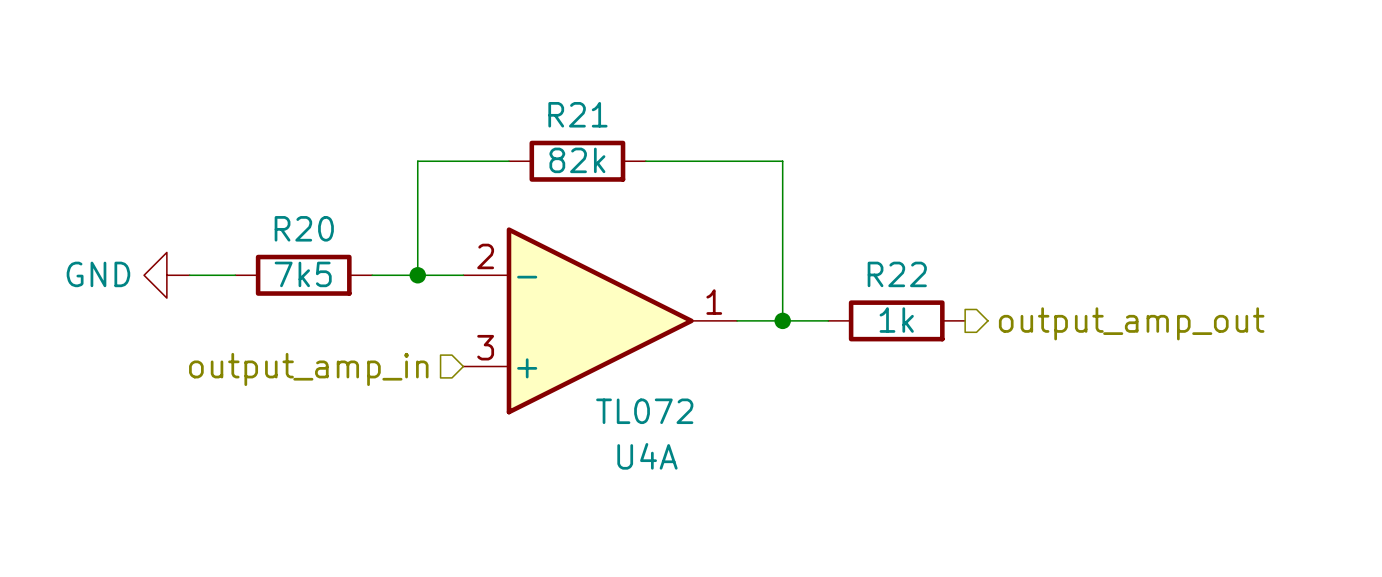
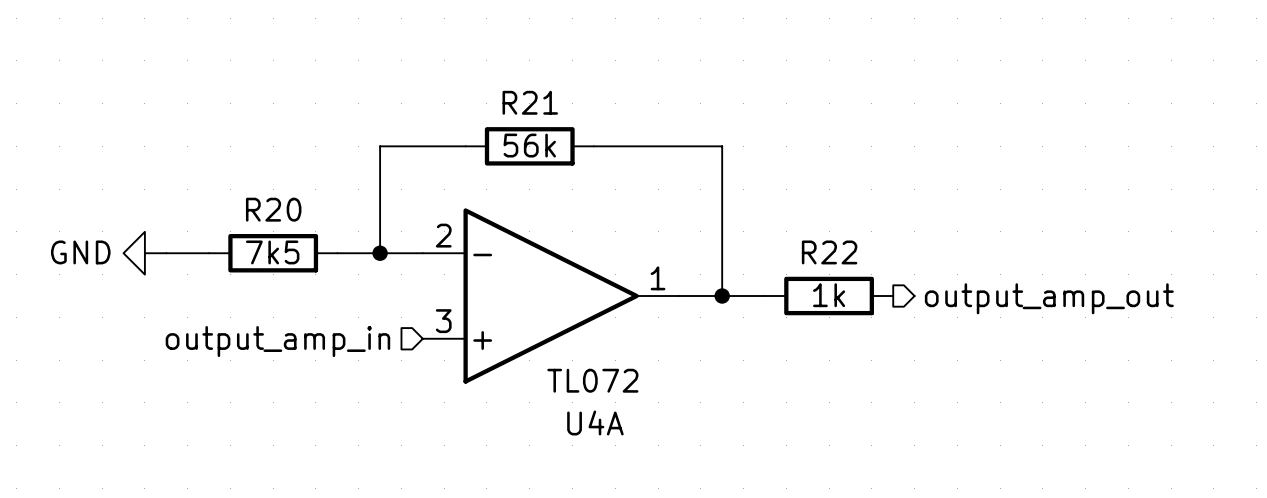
R21 value: 82k (577, 160) -> 56k (529, 145)

